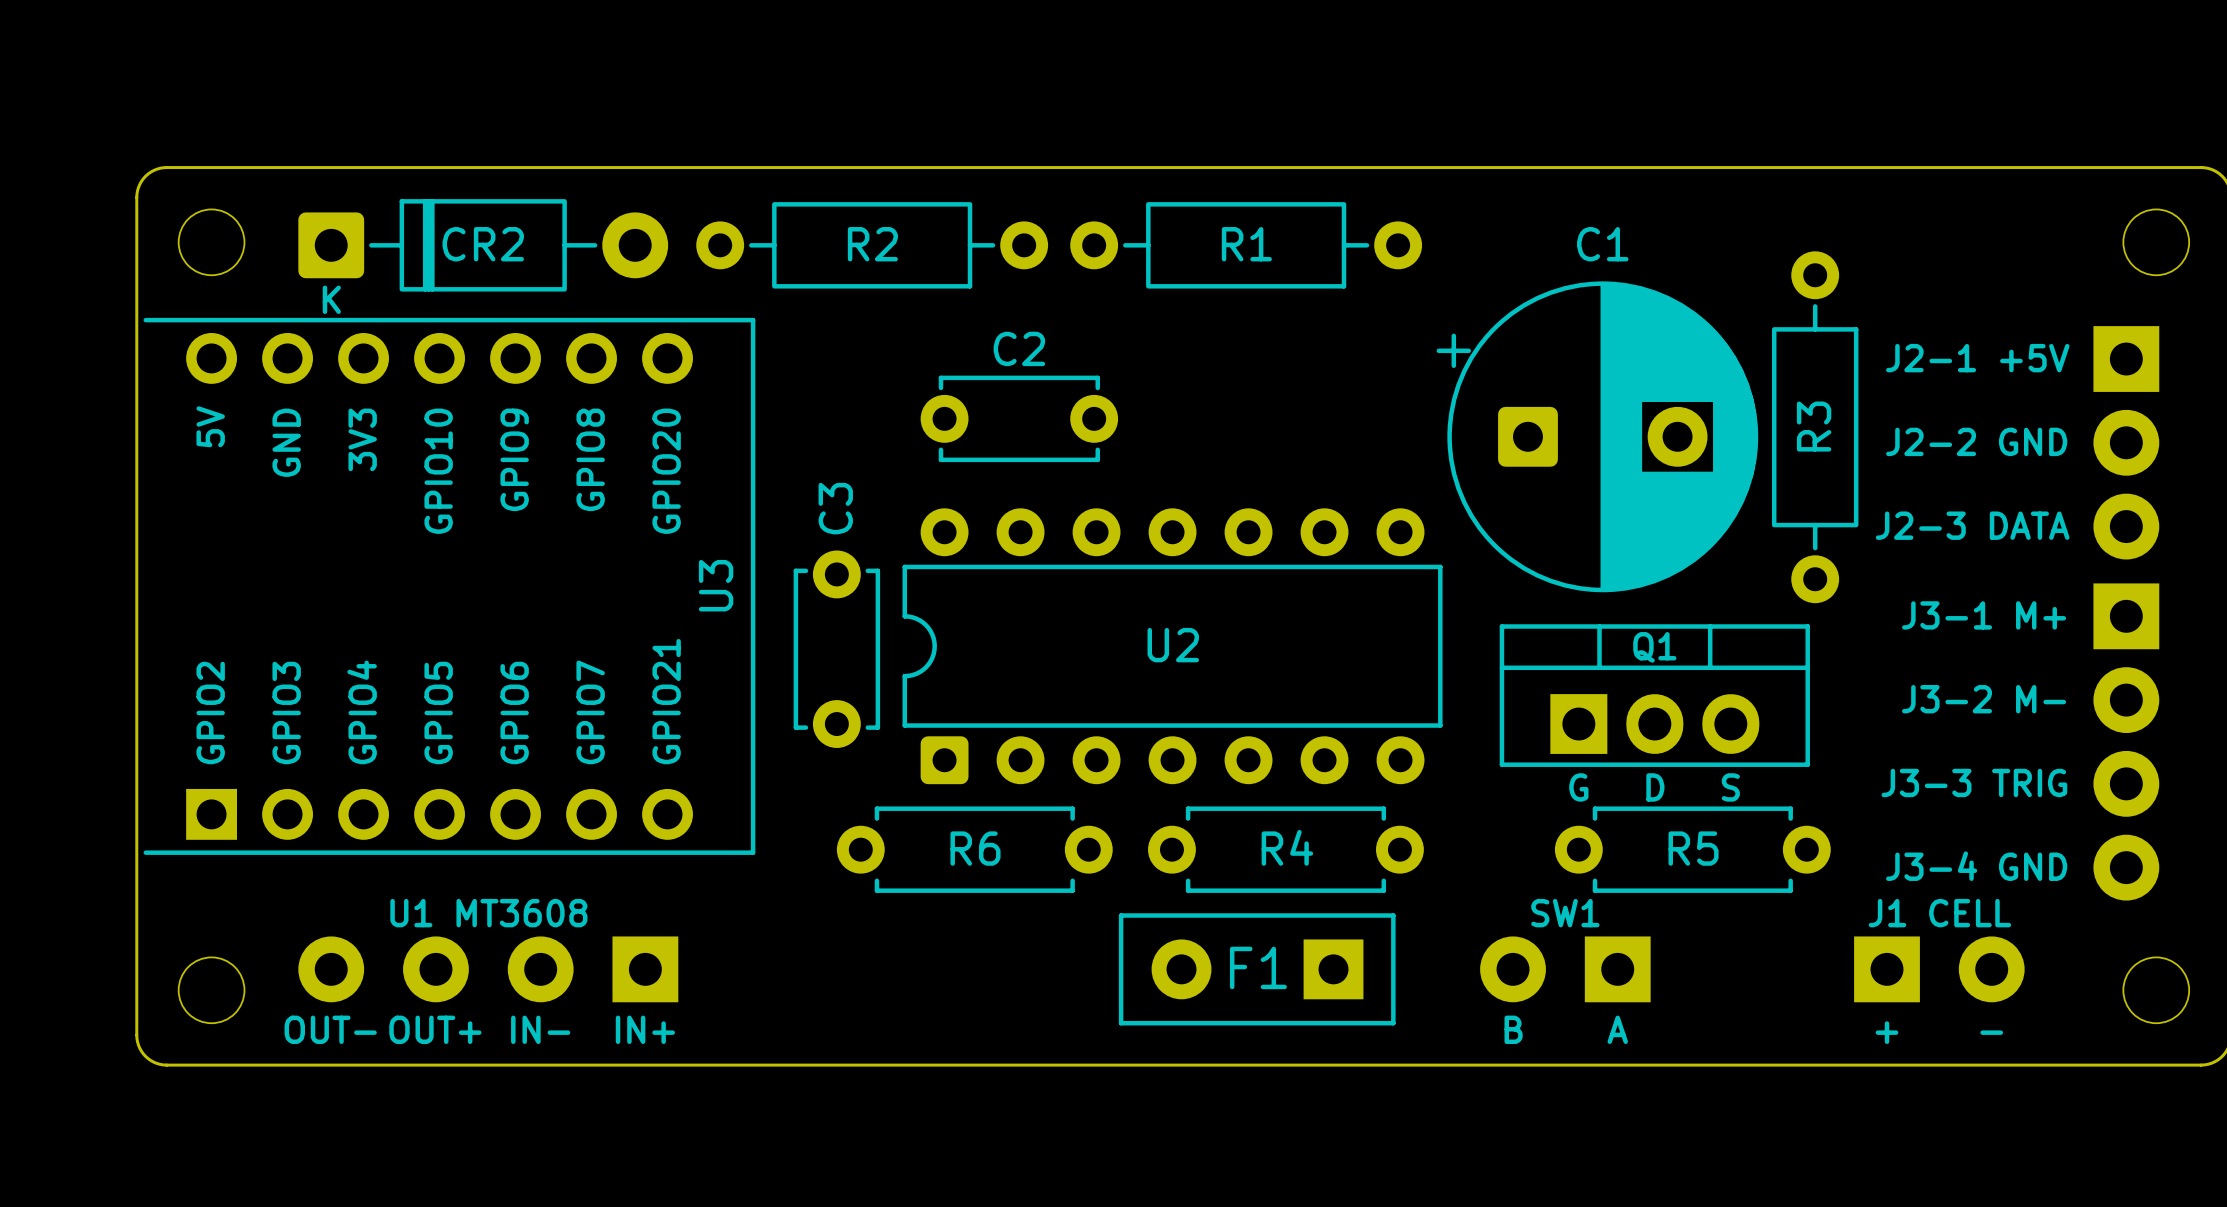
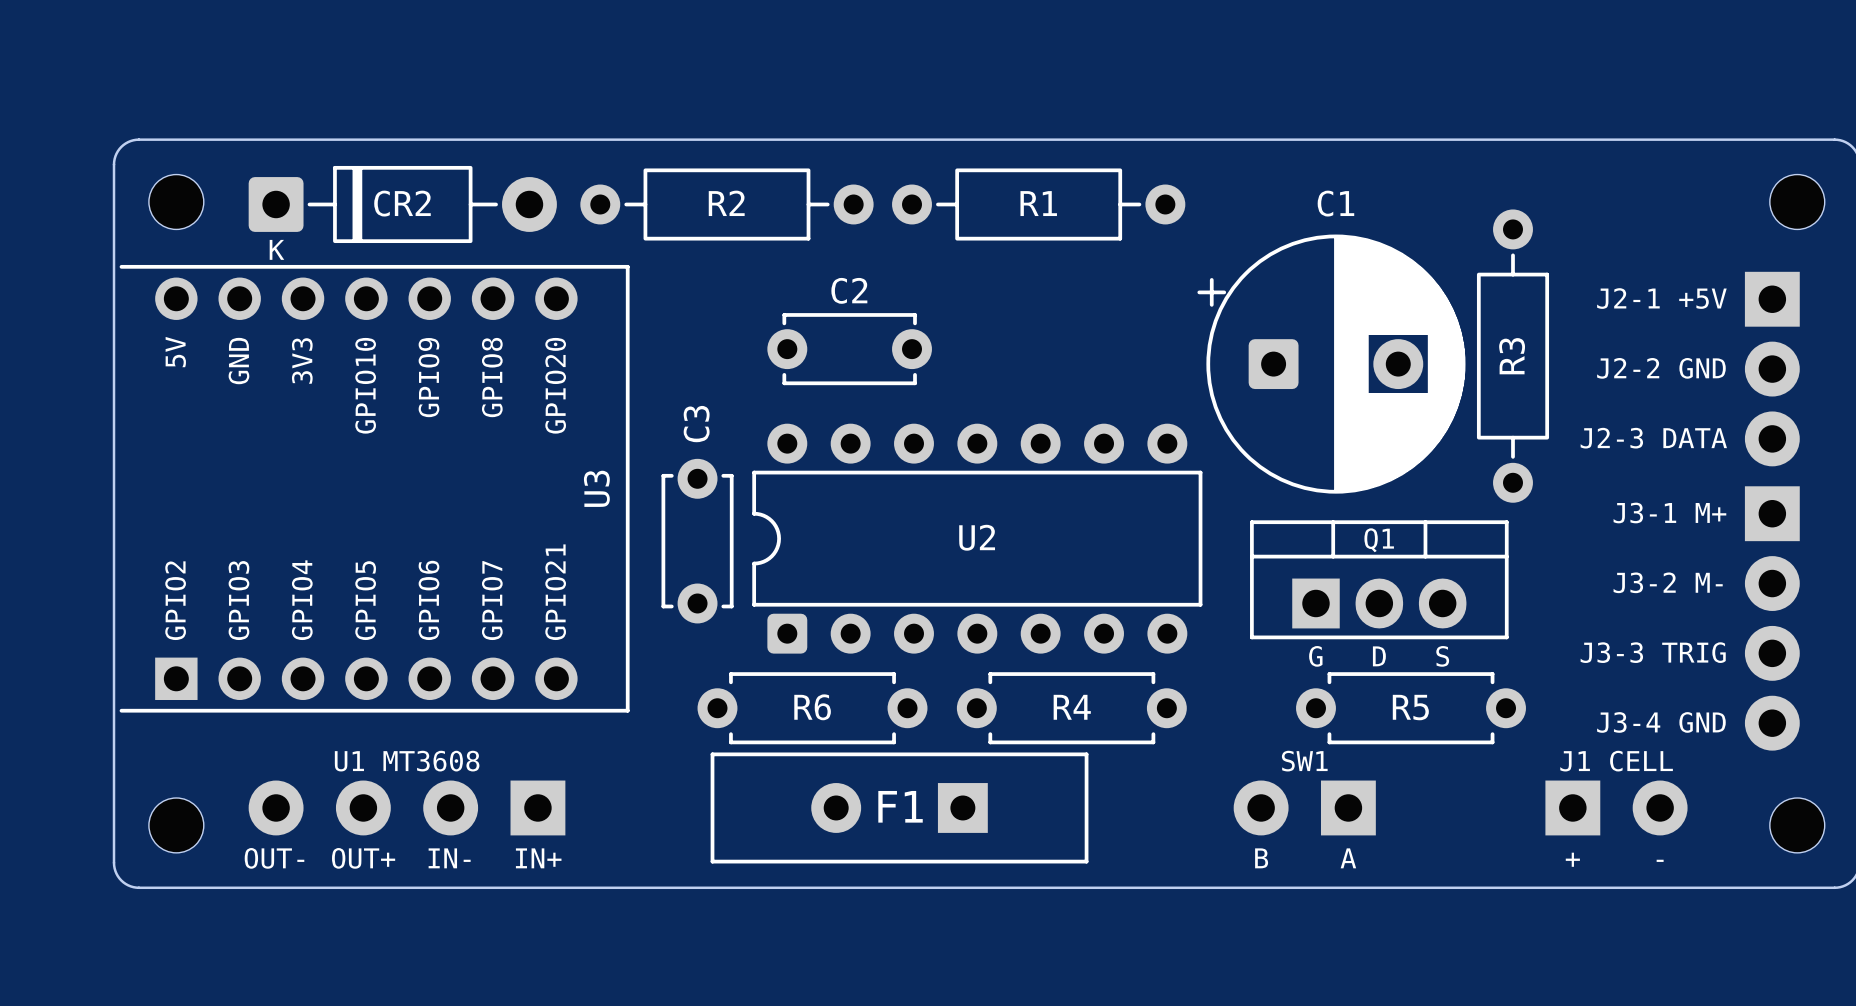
F1 footprint: [1118, 913, 1396, 1026] -> [710, 752, 1089, 864]

